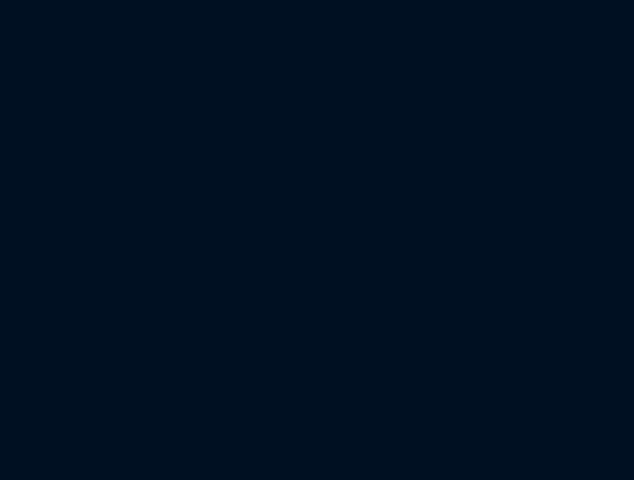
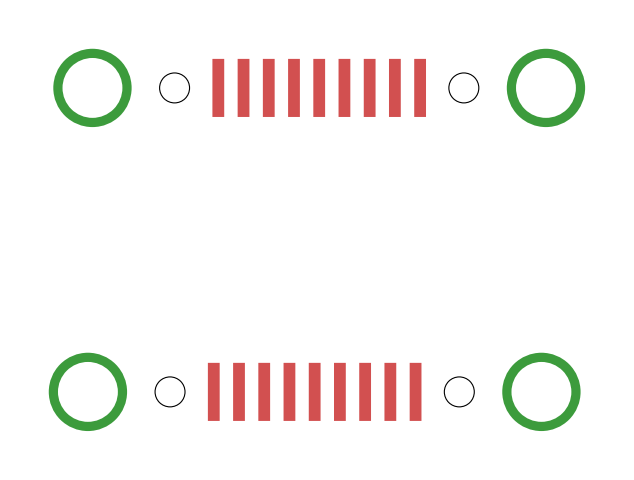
part: none -> (319, 87)
part: none -> (314, 391)

